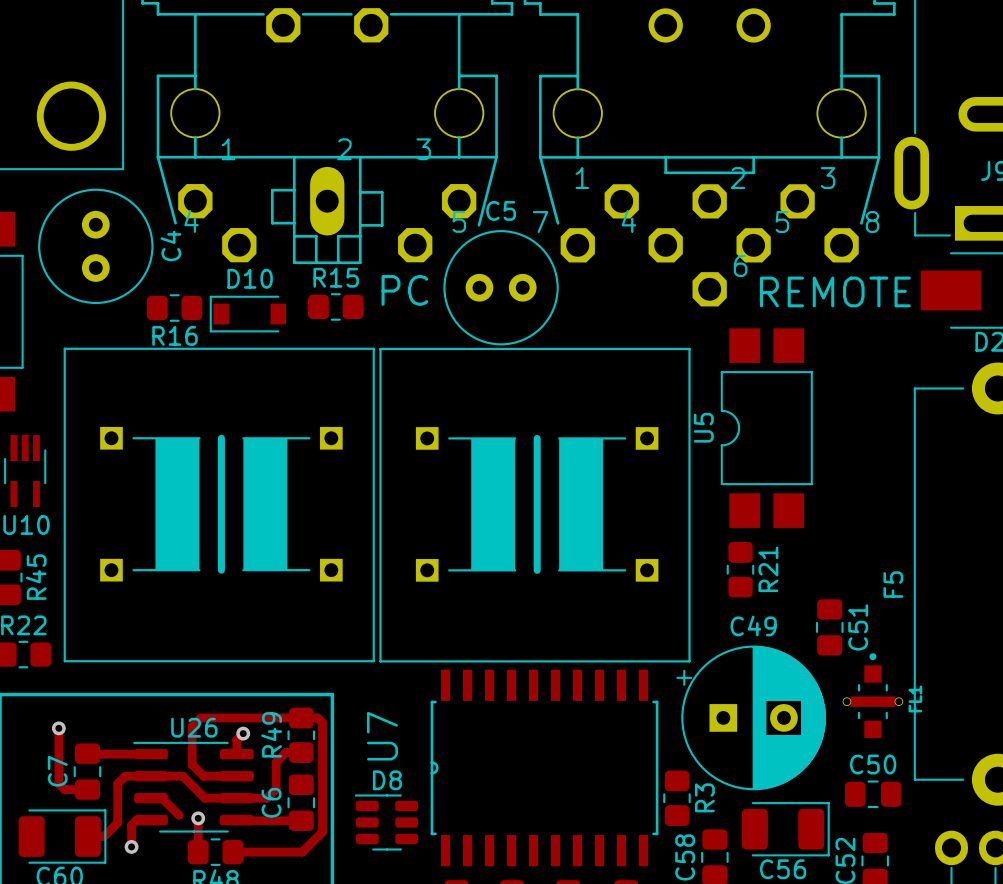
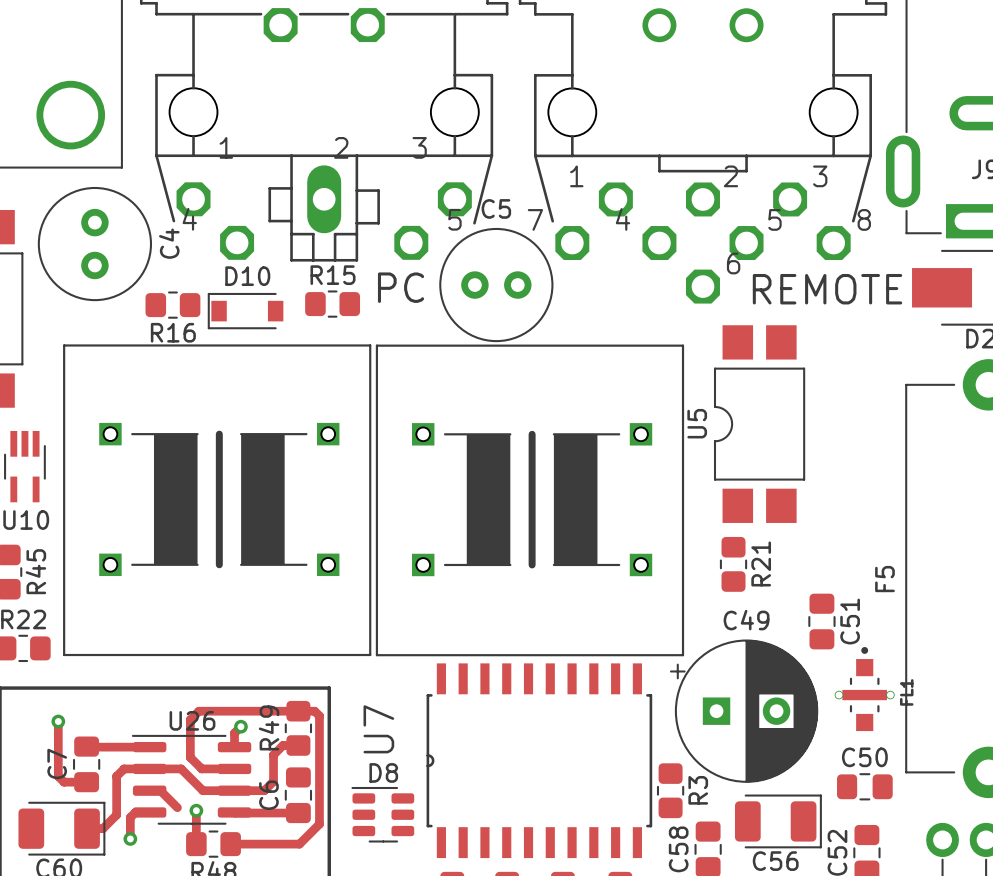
part footprint: [63, 347, 375, 663] -> [63, 344, 372, 657]
part footprint: [379, 347, 691, 663] -> [375, 344, 685, 657]

